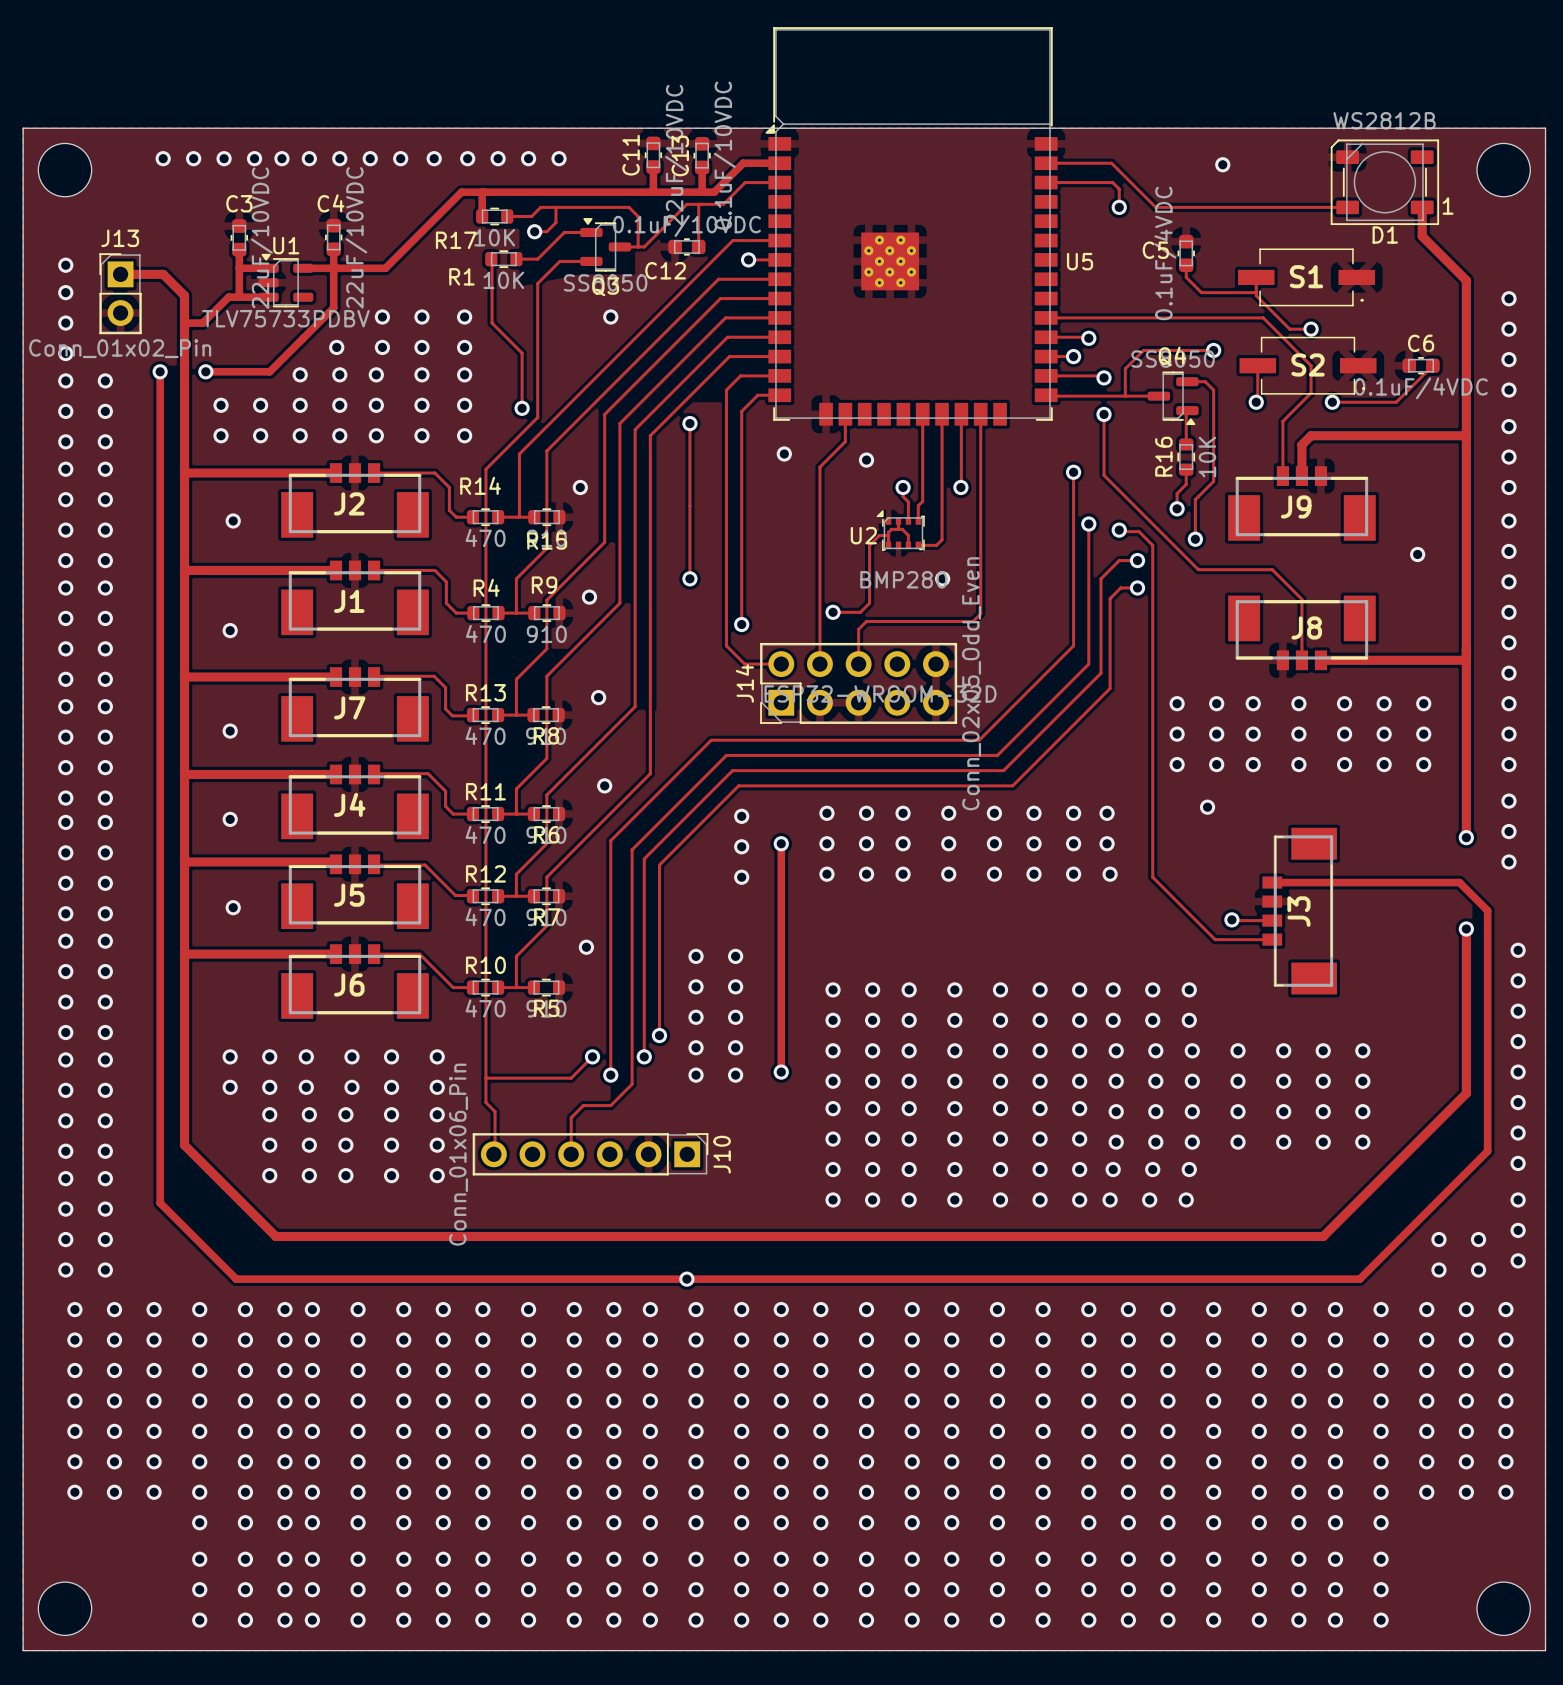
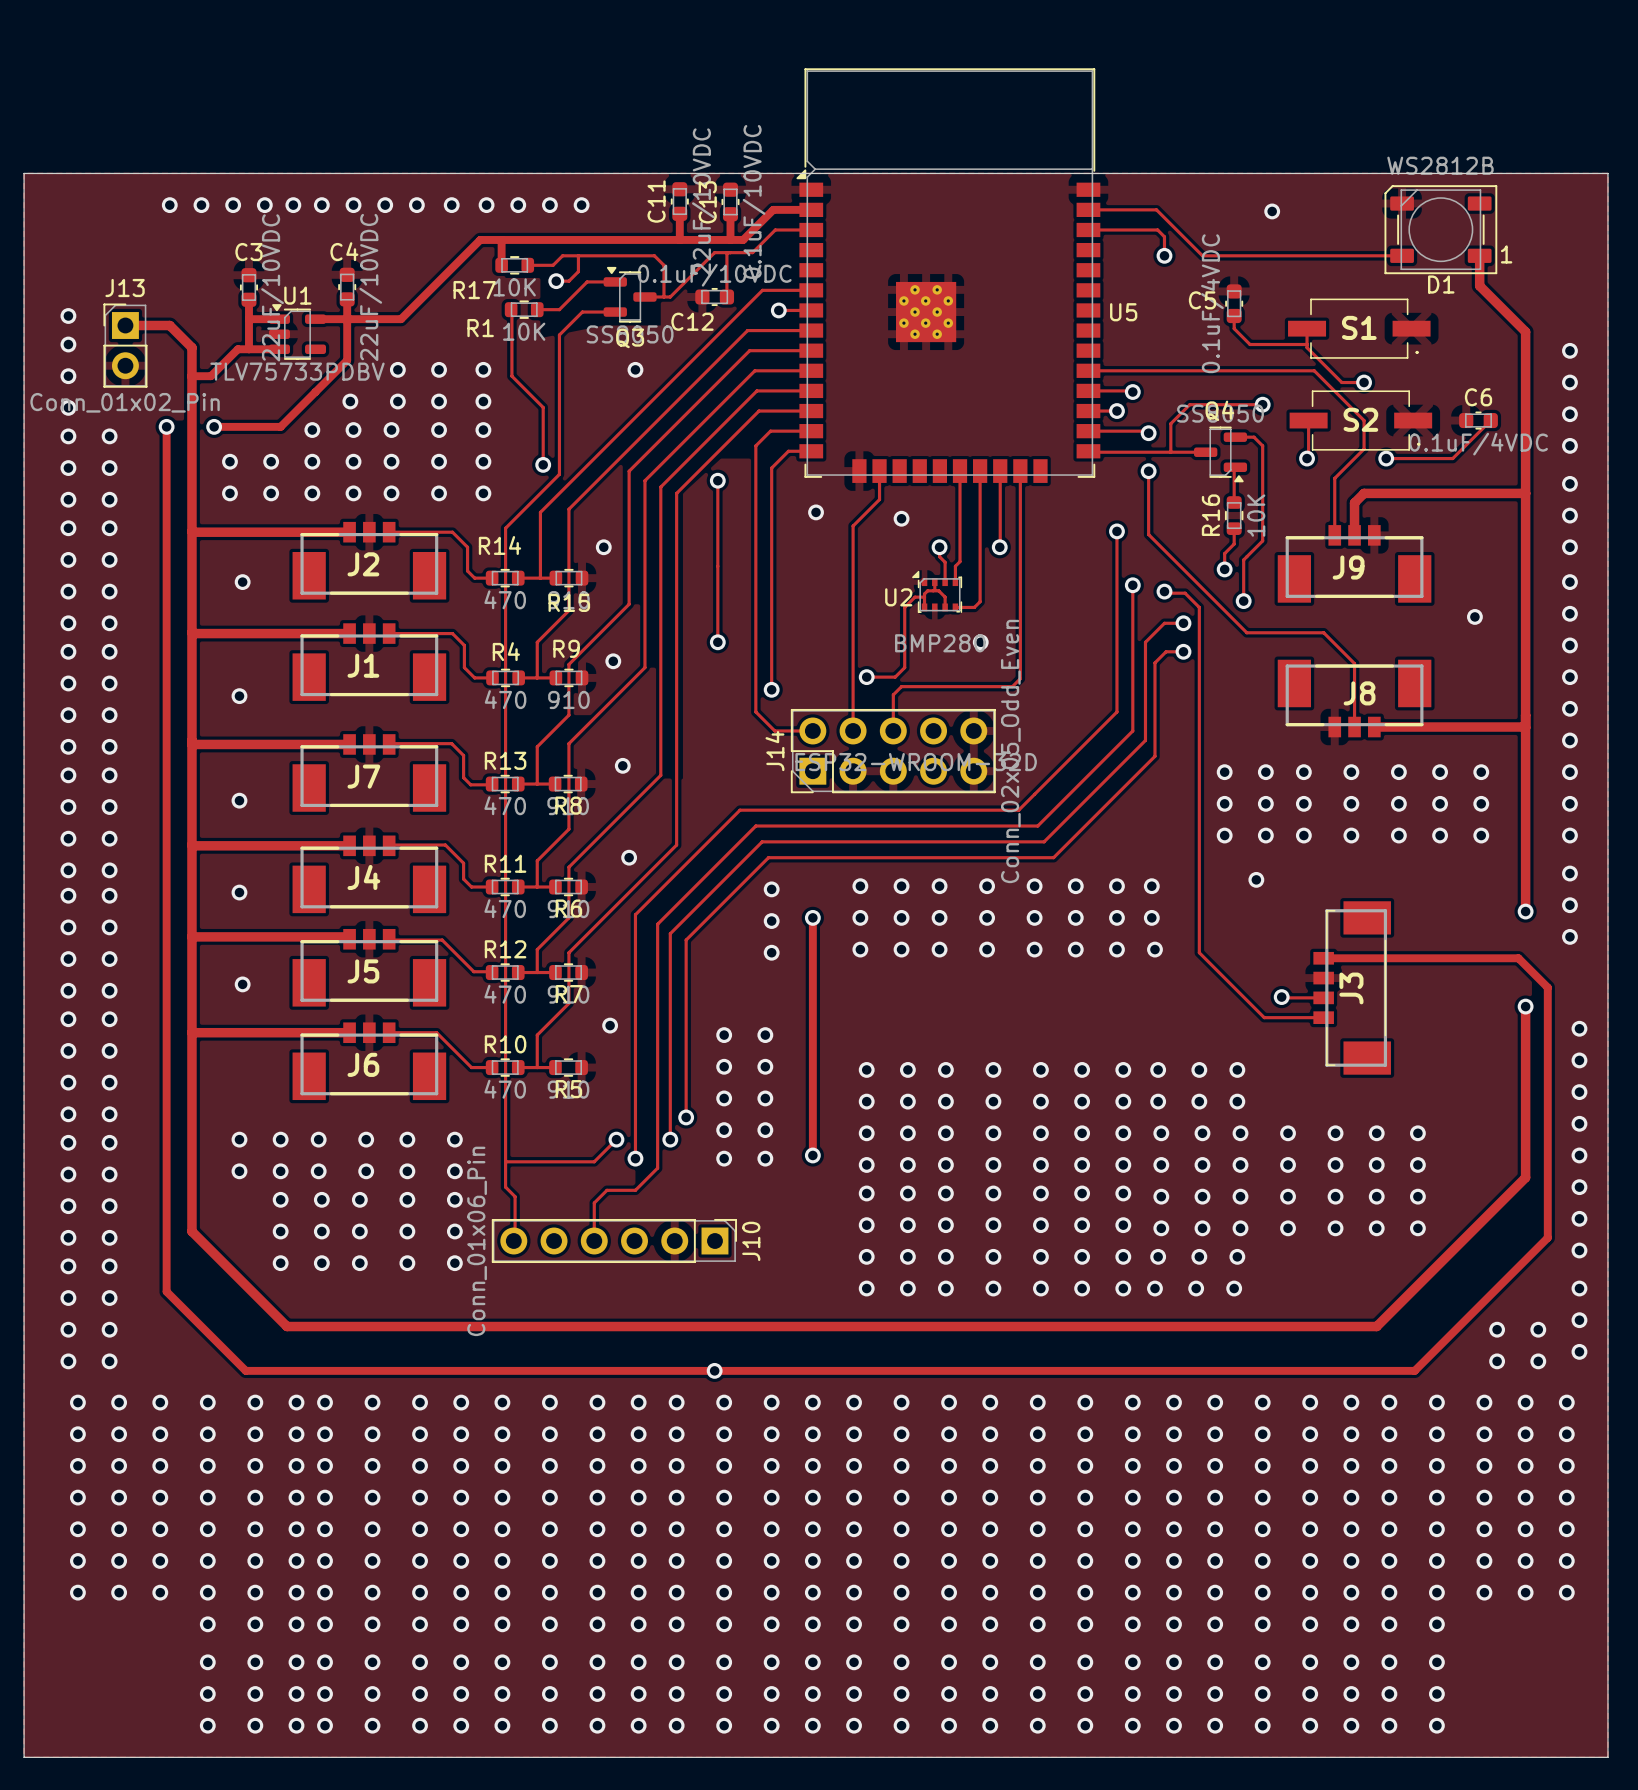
round board edge: [37, 143, 93, 198] -> none
round board edge: [1476, 143, 1531, 198] -> none
round board edge: [37, 1581, 93, 1636] -> none
round board edge: [1476, 1581, 1531, 1636] -> none

